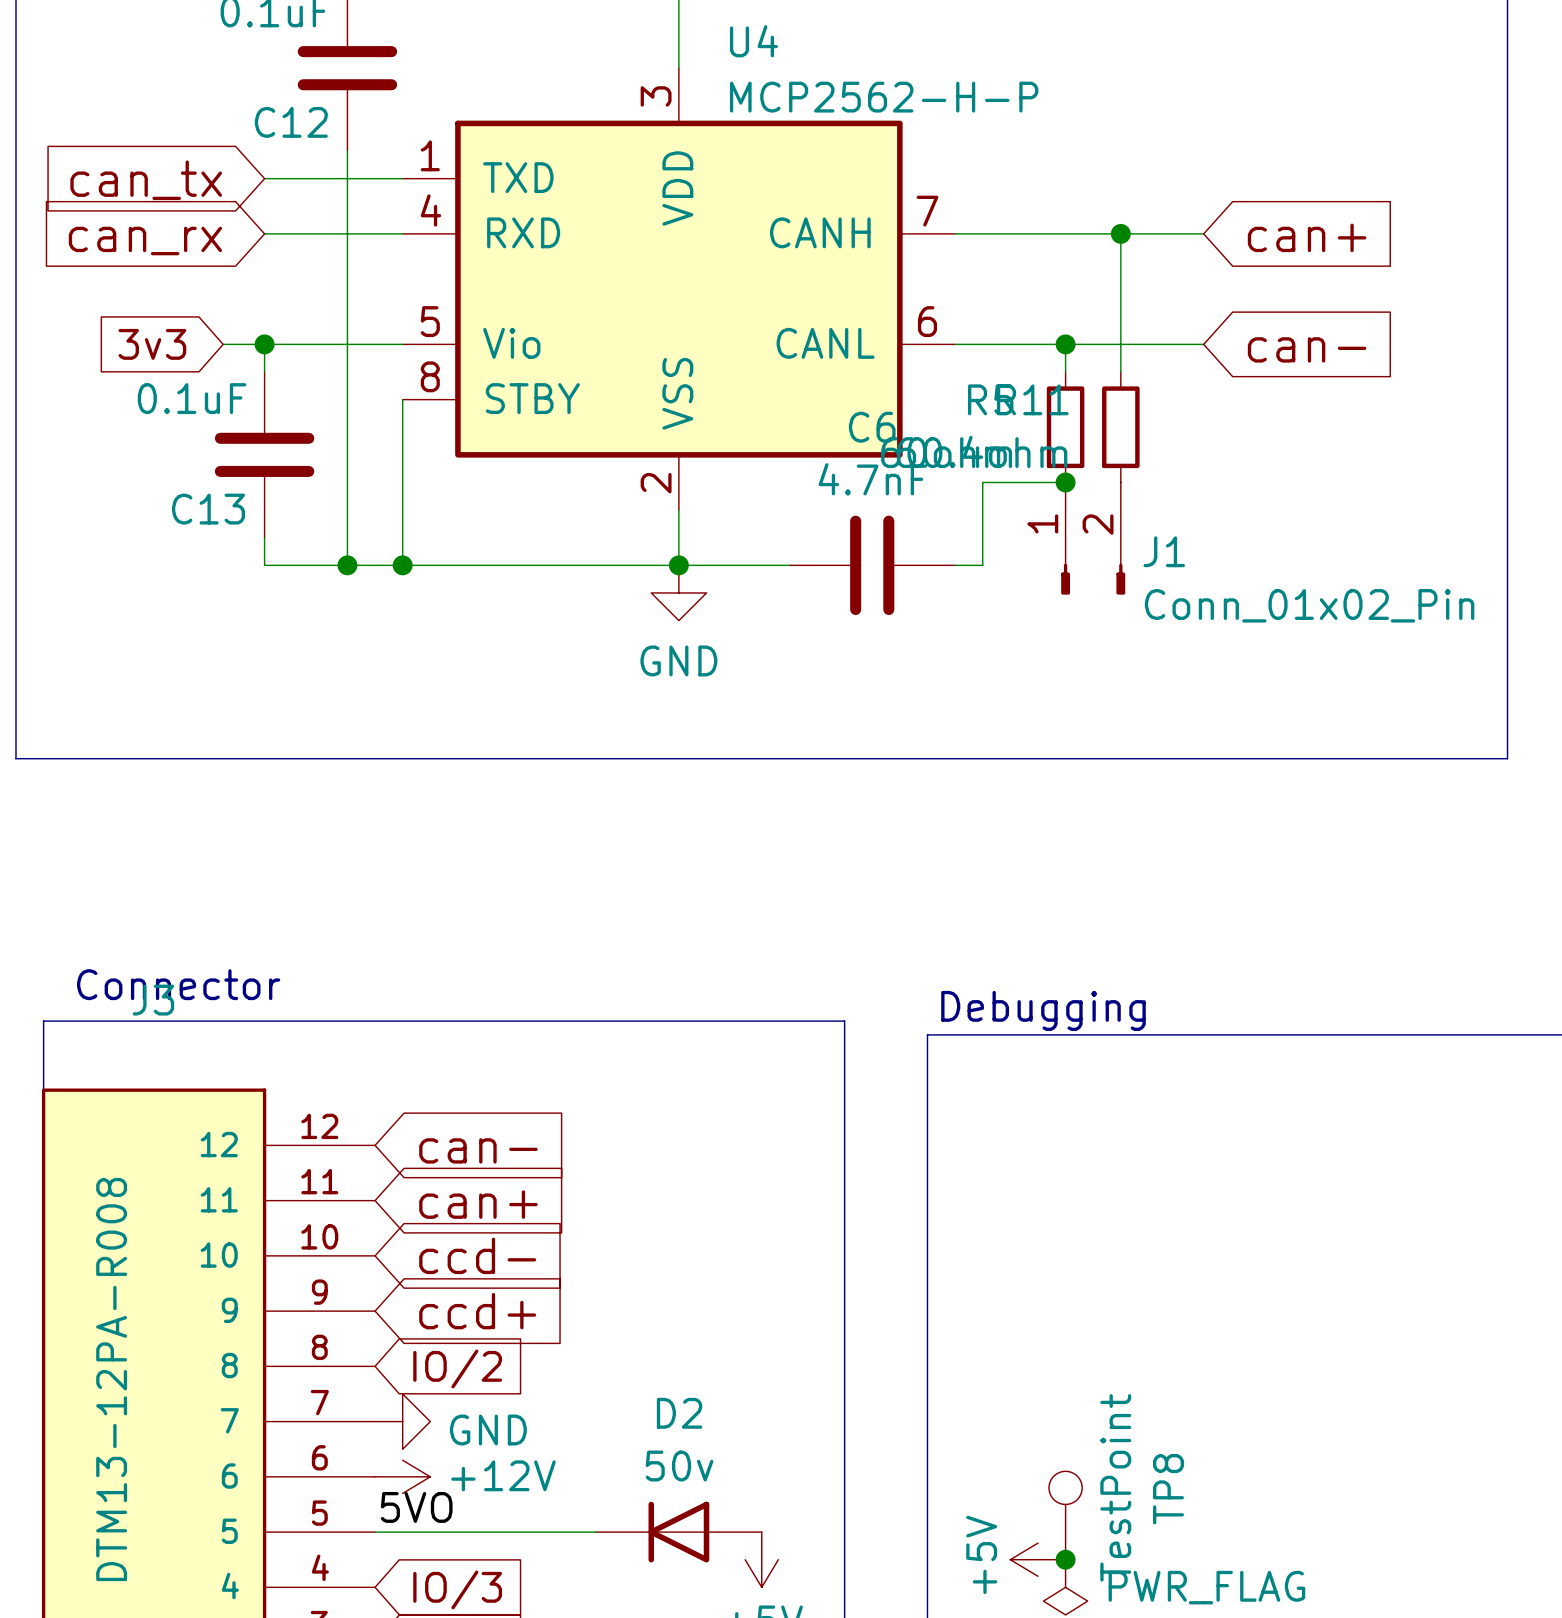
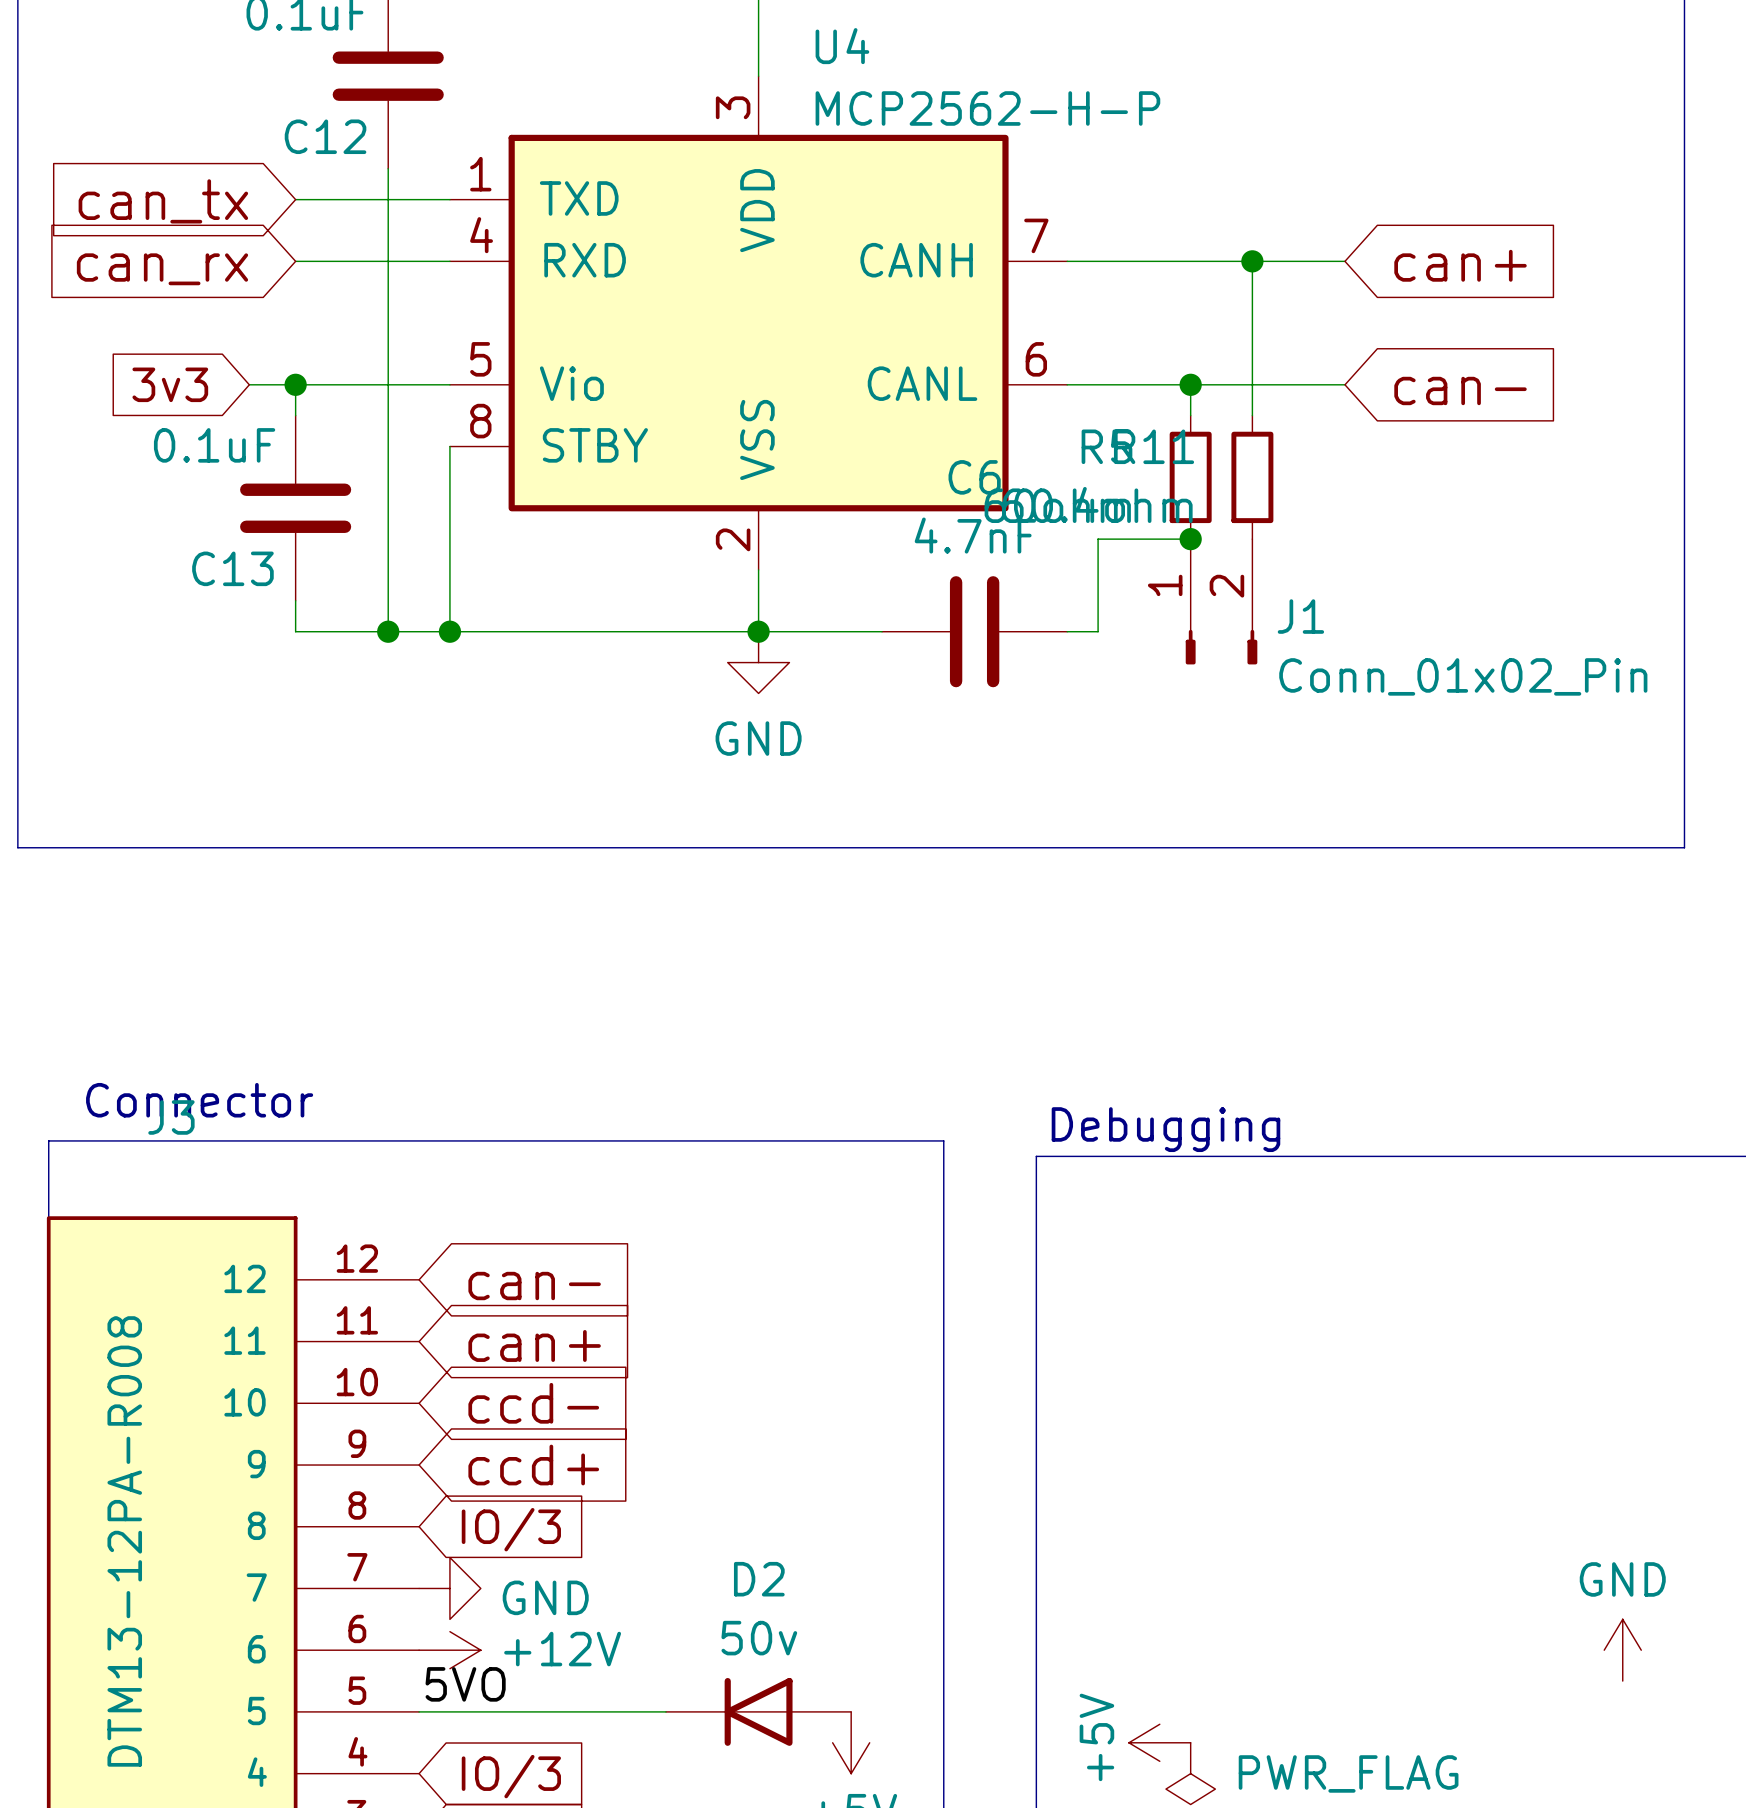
global label: IO/2 (457, 1368) -> IO/3 (511, 1529)
power symbol: none -> GND (1622, 1650)
TP8: TestPoint (1065, 1515) -> none
junction: (1065, 1559) -> none

